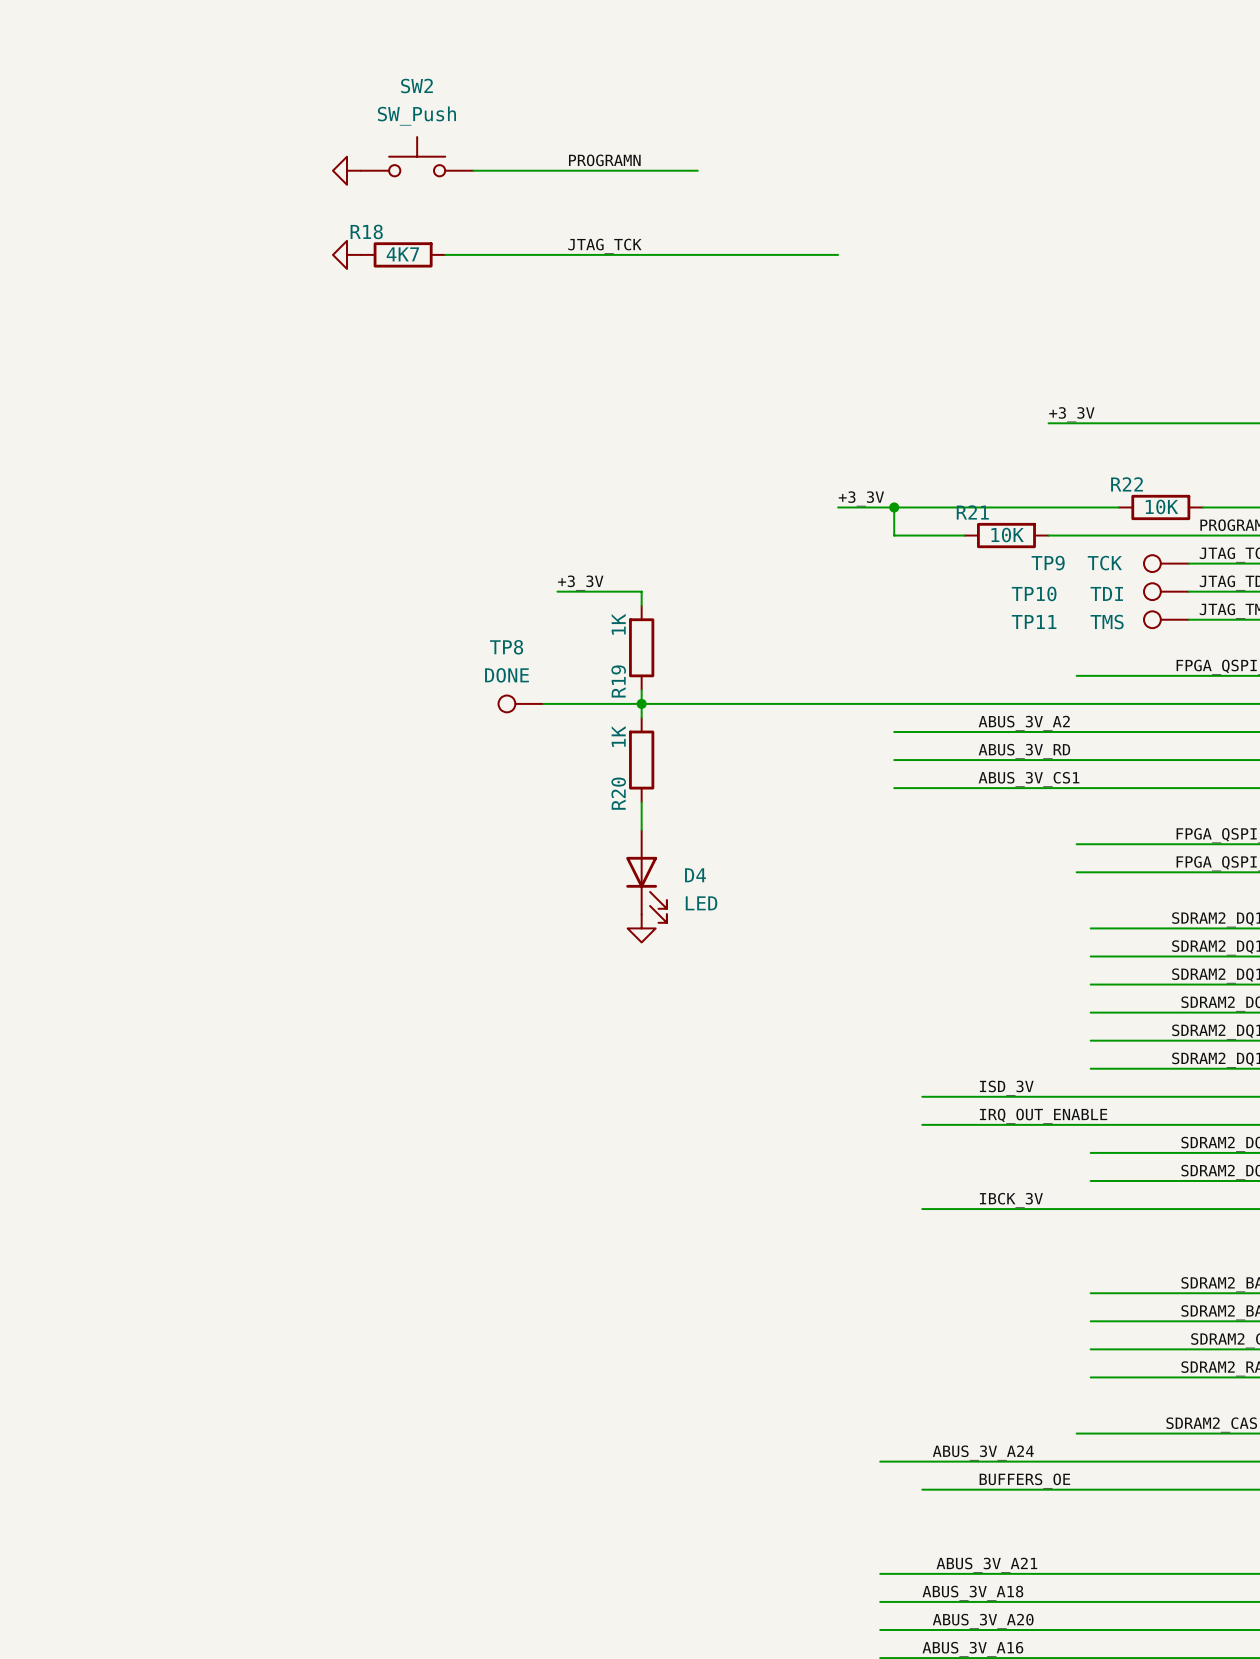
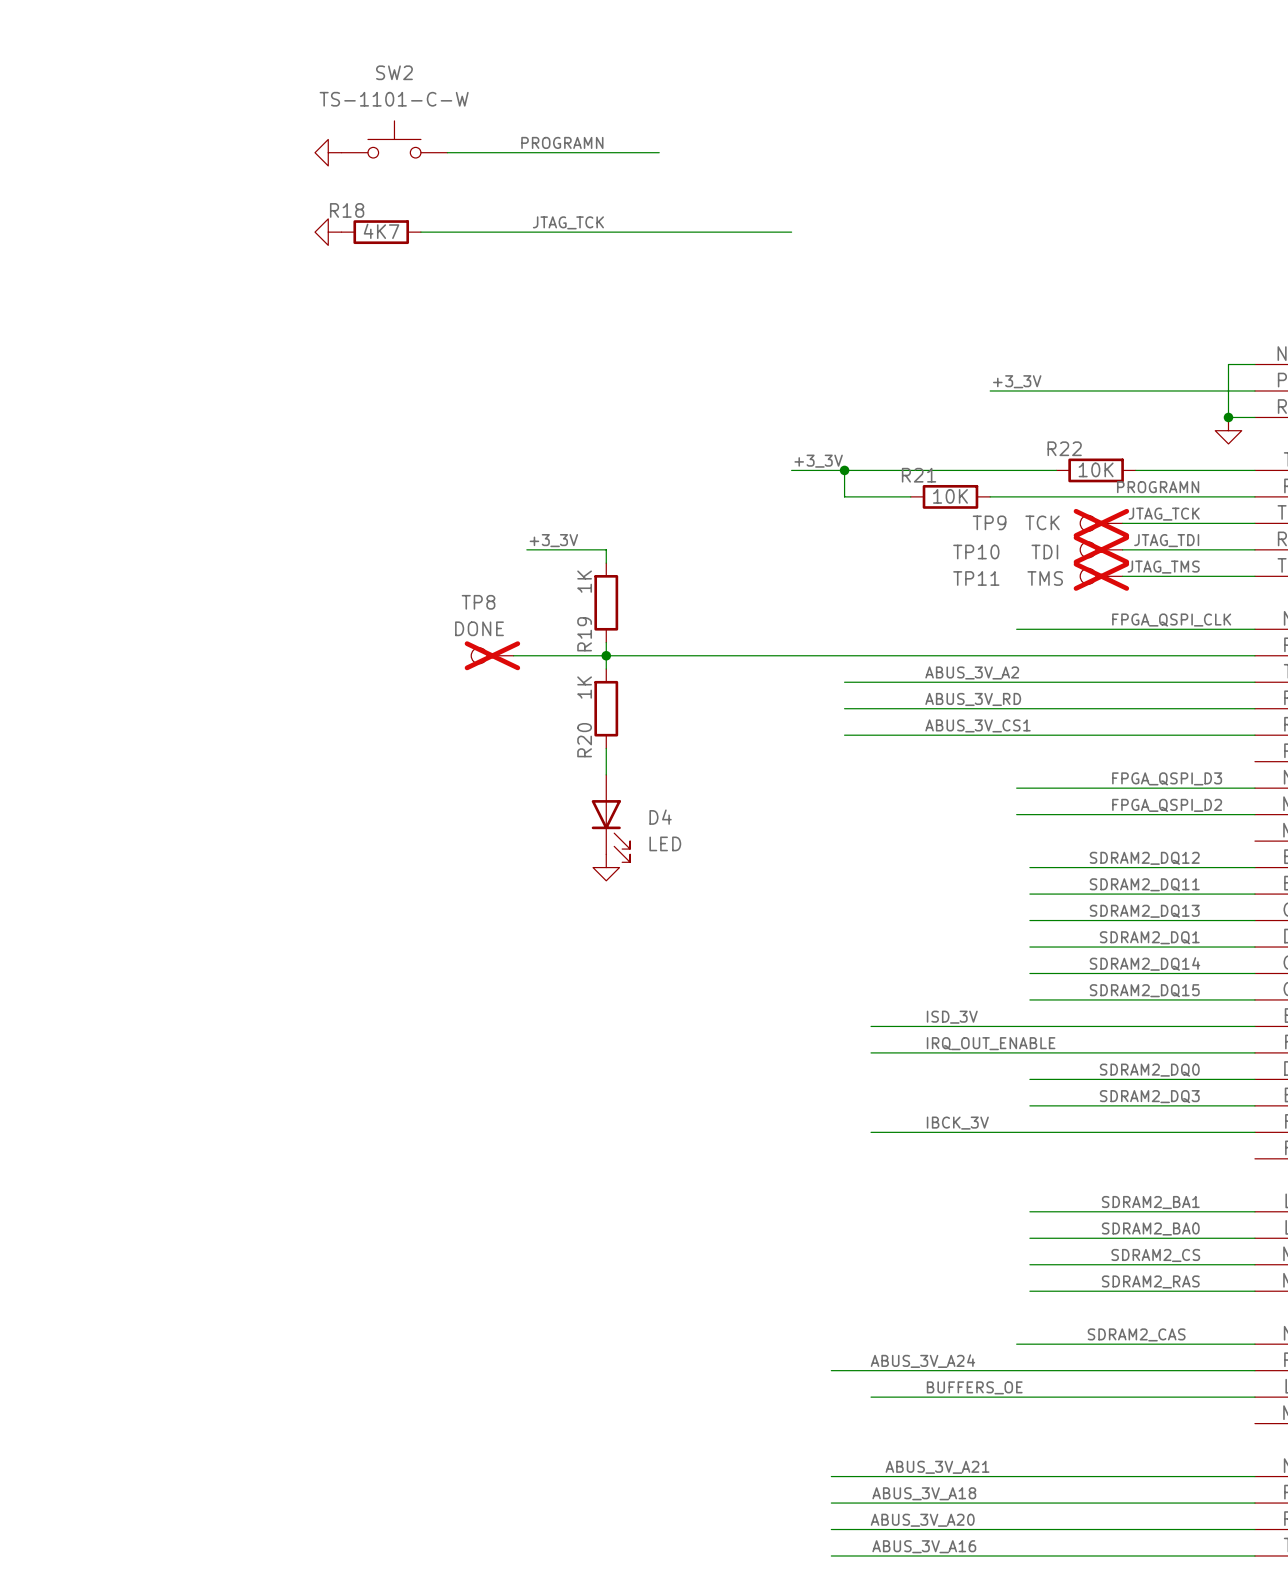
SW2 value: SW_Push (416, 116) -> TS-1101-C-W (394, 99)
TP9 do-not-place cross: none -> (1101, 523)
TP10 do-not-place cross: none -> (1101, 549)
TP11 do-not-place cross: none -> (1101, 576)
TP8 do-not-place cross: none -> (492, 655)

